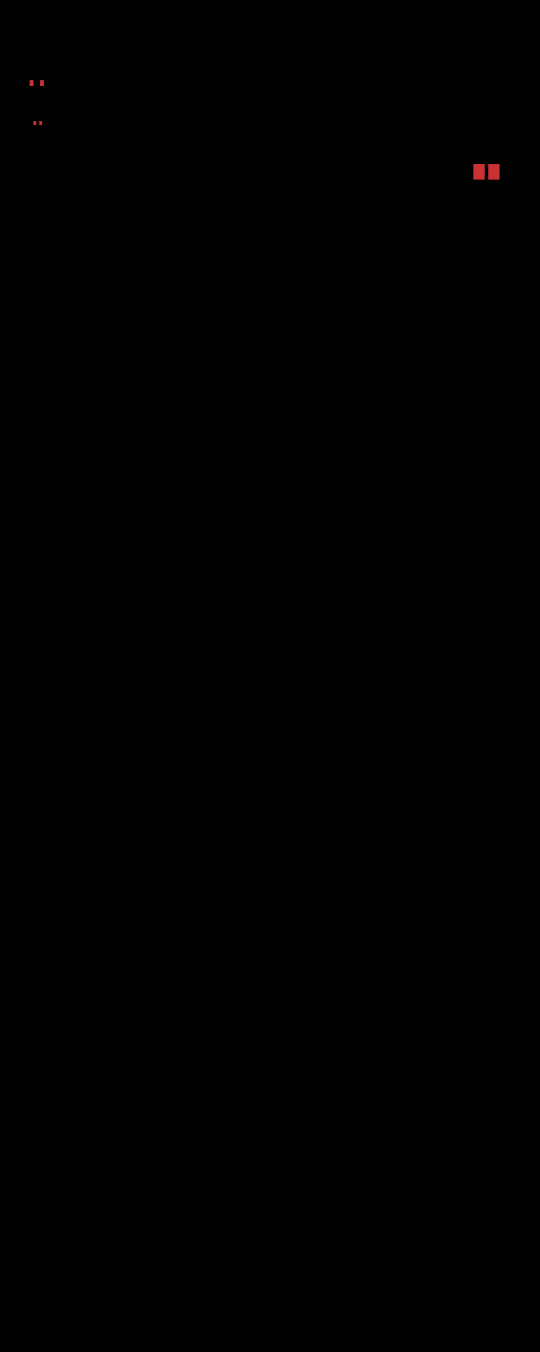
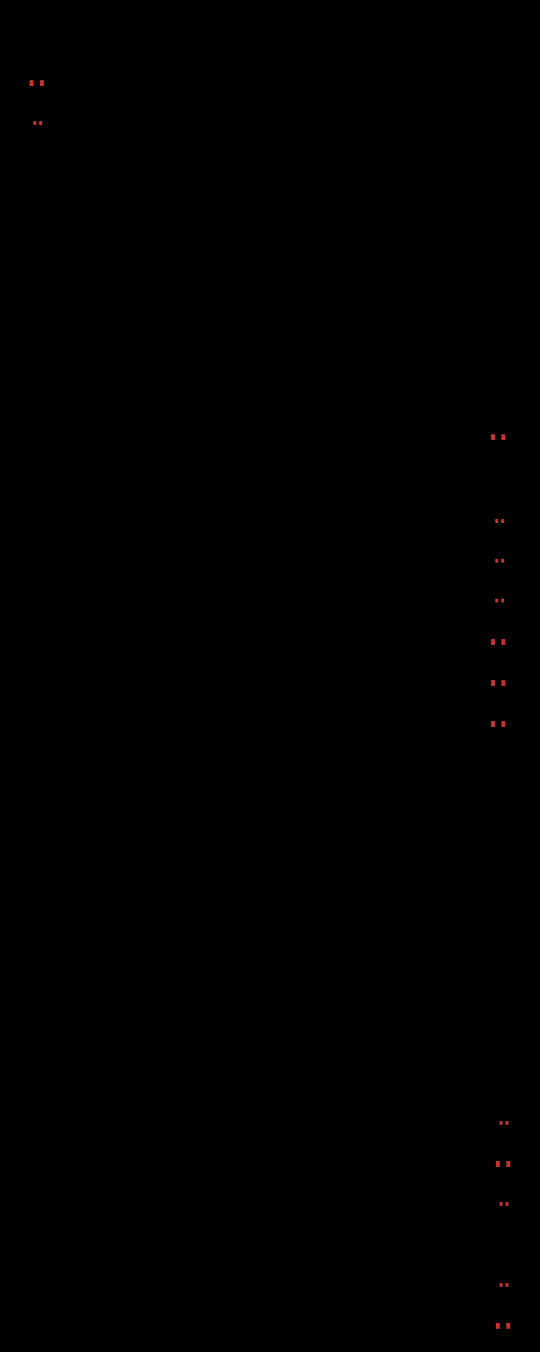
part: (486, 171) -> none
part: none -> (498, 437)
part: none -> (499, 521)
part: none -> (499, 560)
part: none -> (499, 600)
part: none -> (498, 642)
part: none -> (498, 682)
part: none -> (498, 723)
part: none -> (504, 1122)
part: none -> (503, 1163)
part: none -> (504, 1203)
part: none -> (504, 1284)
part: none -> (503, 1325)

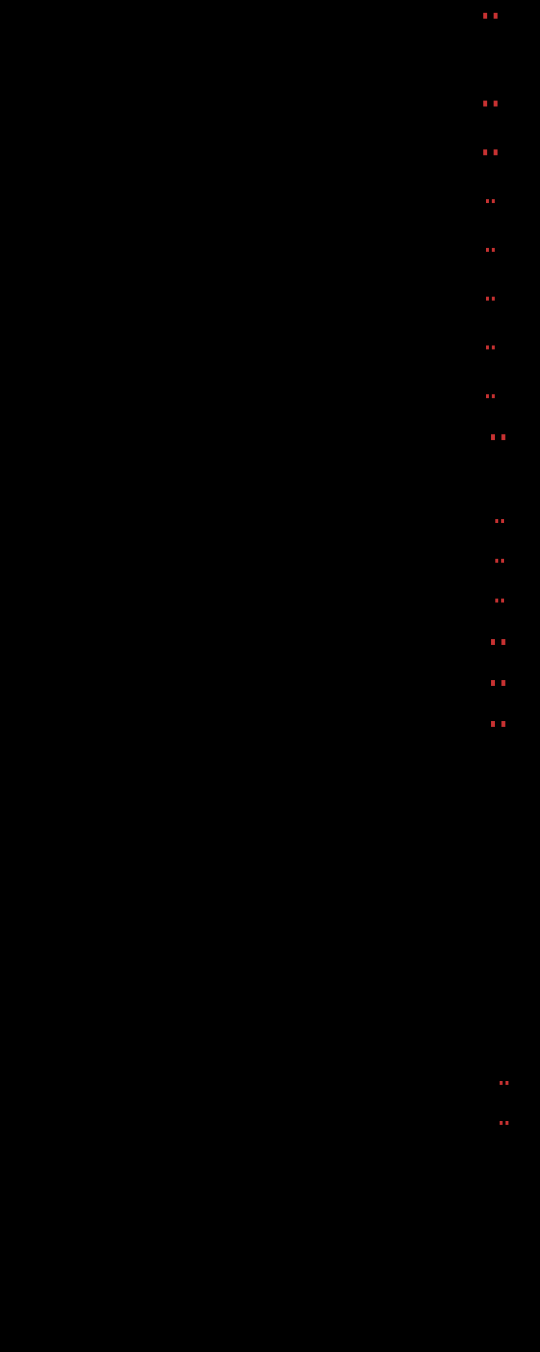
part: none -> (490, 15)
part: (36, 83) -> none
part: none -> (490, 103)
part: (37, 123) -> none
part: none -> (490, 152)
part: none -> (490, 201)
part: none -> (490, 249)
part: none -> (490, 298)
part: none -> (490, 347)
part: none -> (490, 396)
part: none -> (504, 1082)
part: (503, 1163) -> none
part: (504, 1203) -> none
part: (504, 1284) -> none
part: (503, 1325) -> none

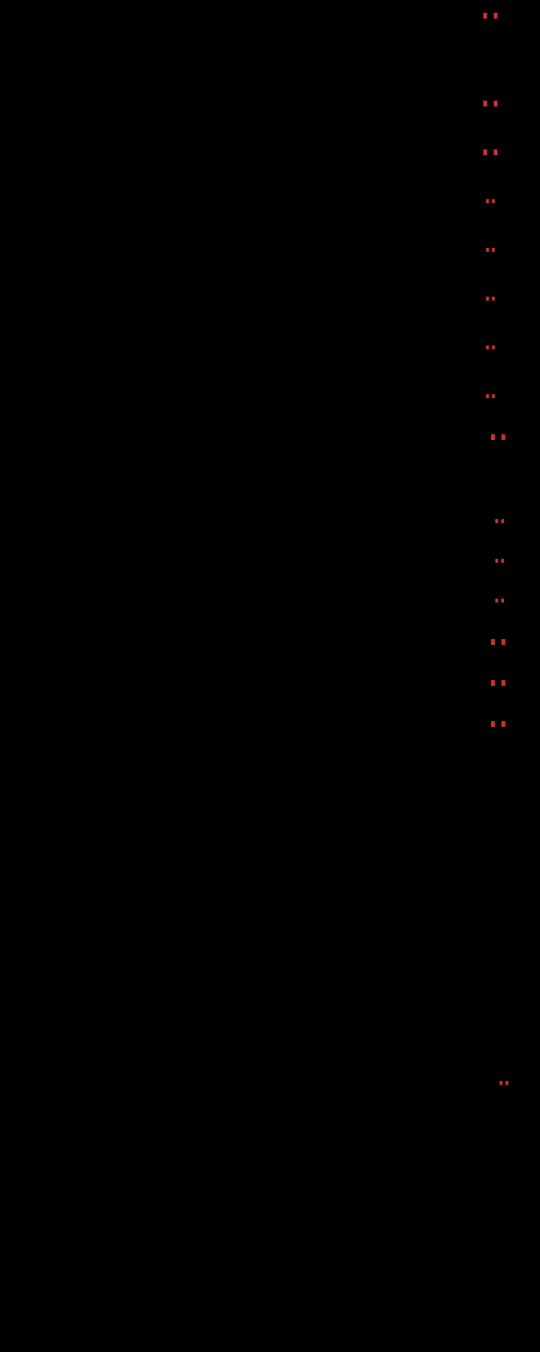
part: (504, 1122) -> none

